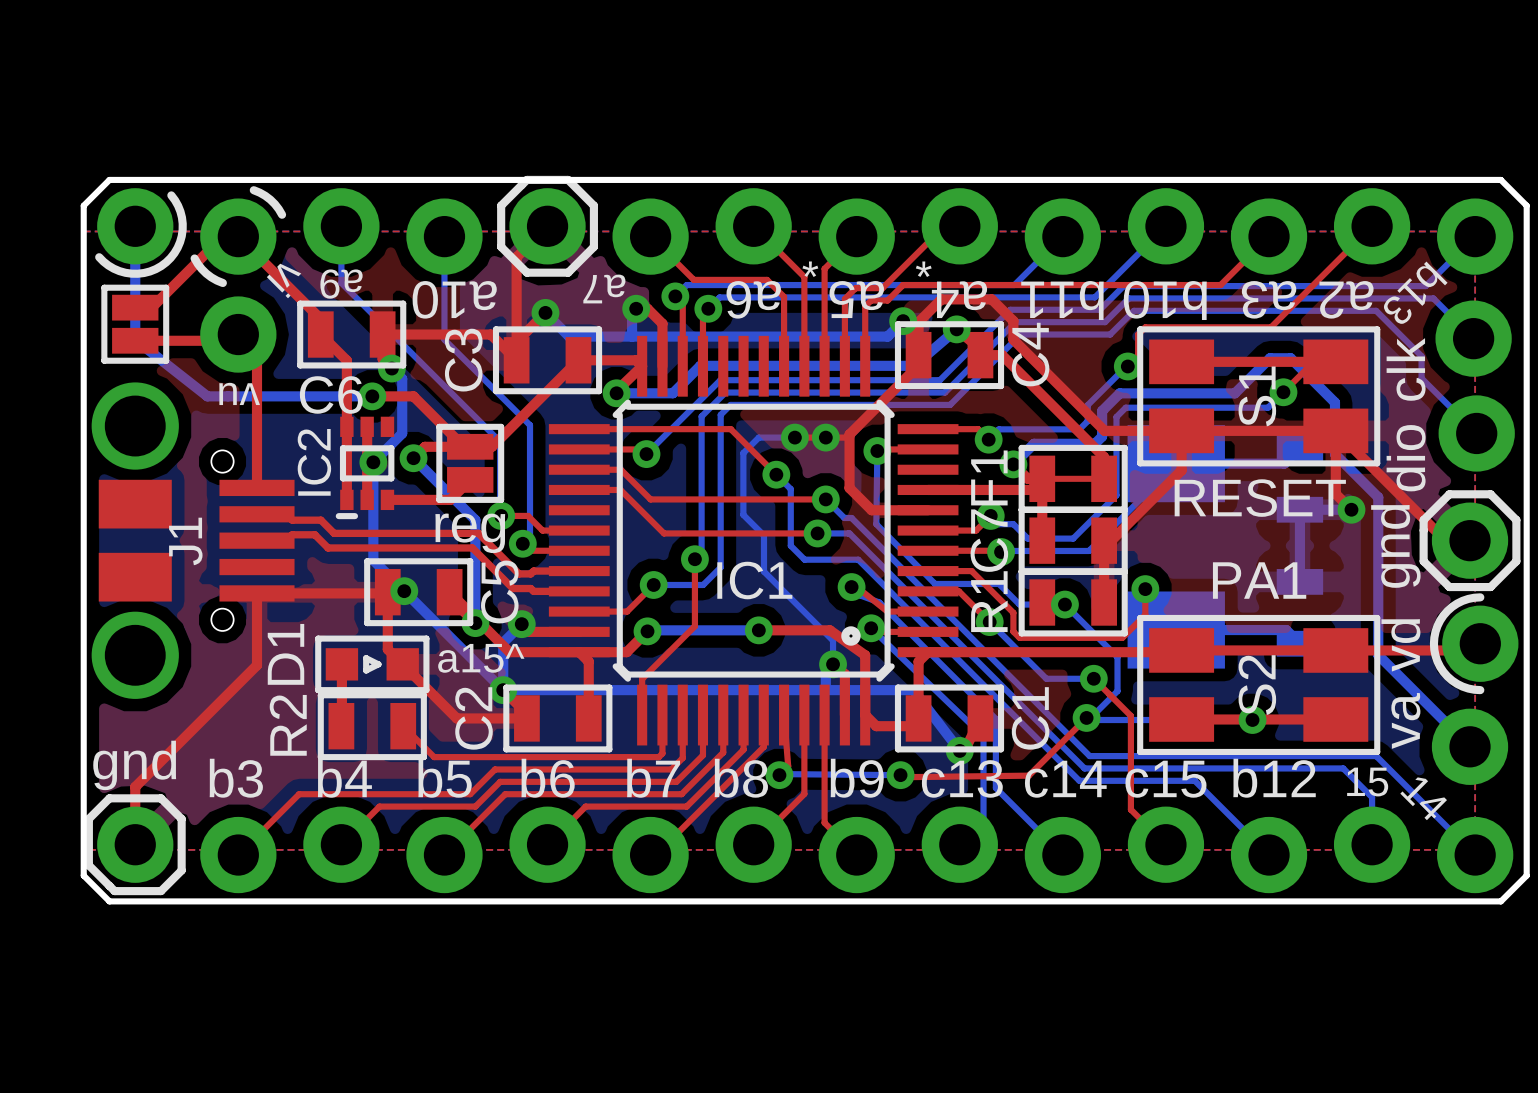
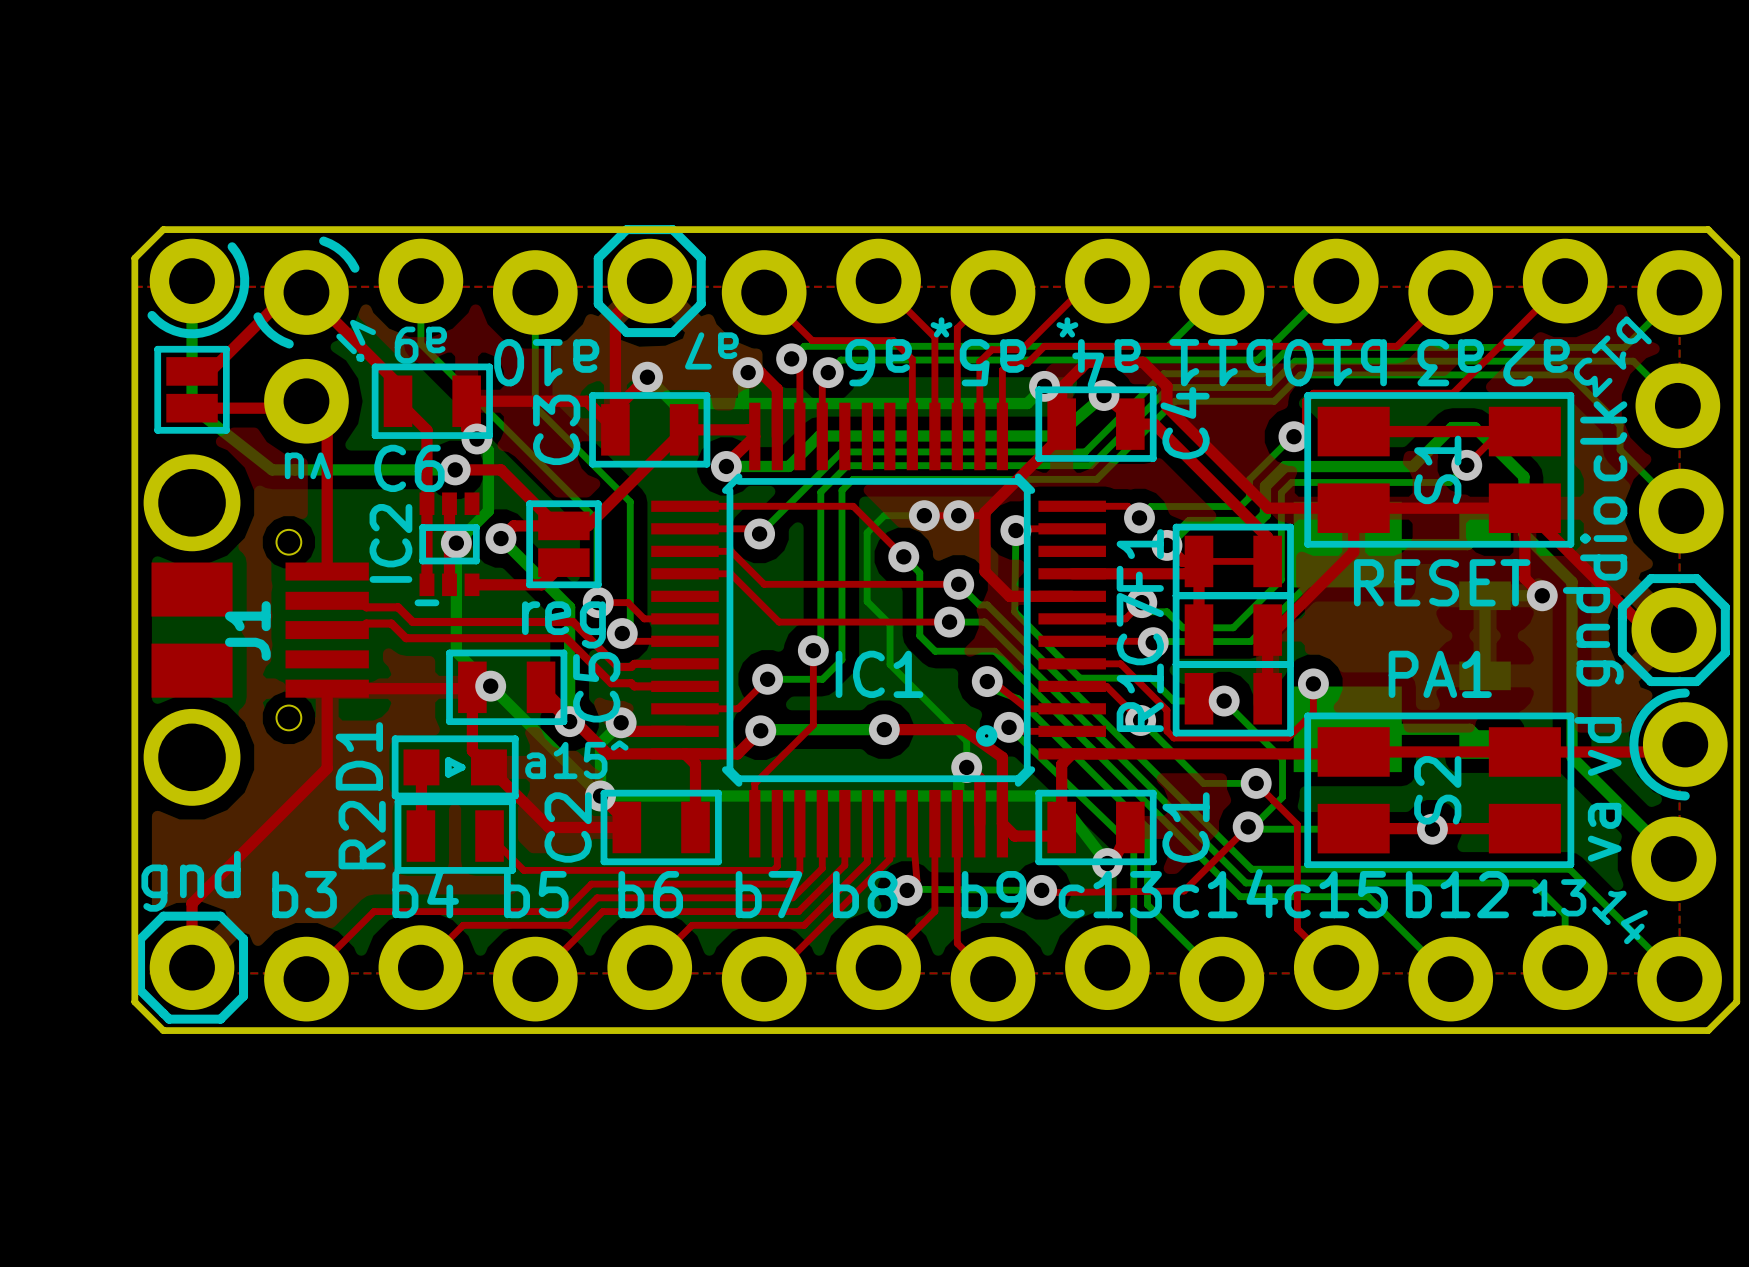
text: 15 (1367, 782) -> 13 (1559, 897)

